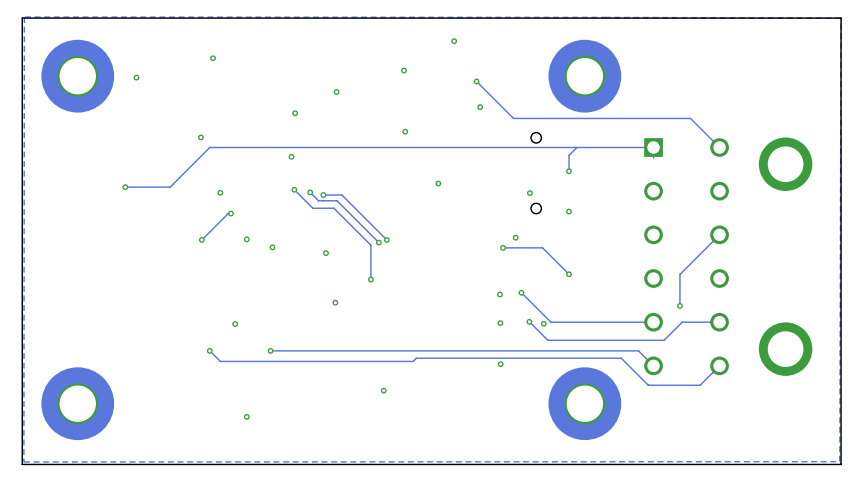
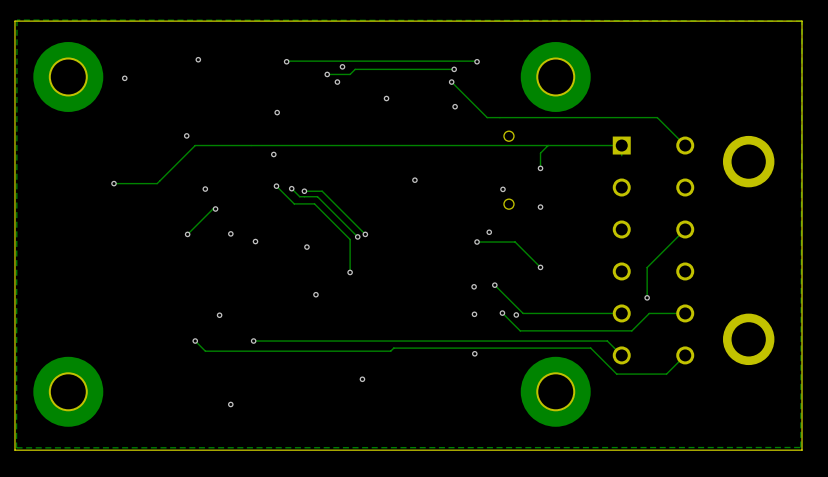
via: (454, 41) -> none
via: none -> (286, 61)
track: none -> (477, 61) (286, 61)
via: none -> (477, 61)
via: none -> (342, 66)
track: none -> (454, 69) (355, 69) (350, 74) (327, 74)
via: none -> (454, 69)
via: (403, 70) -> none
via: none -> (327, 74)
via: none -> (337, 82)
via: (336, 92) -> none
via: none -> (386, 98)
via: (405, 131) -> none

